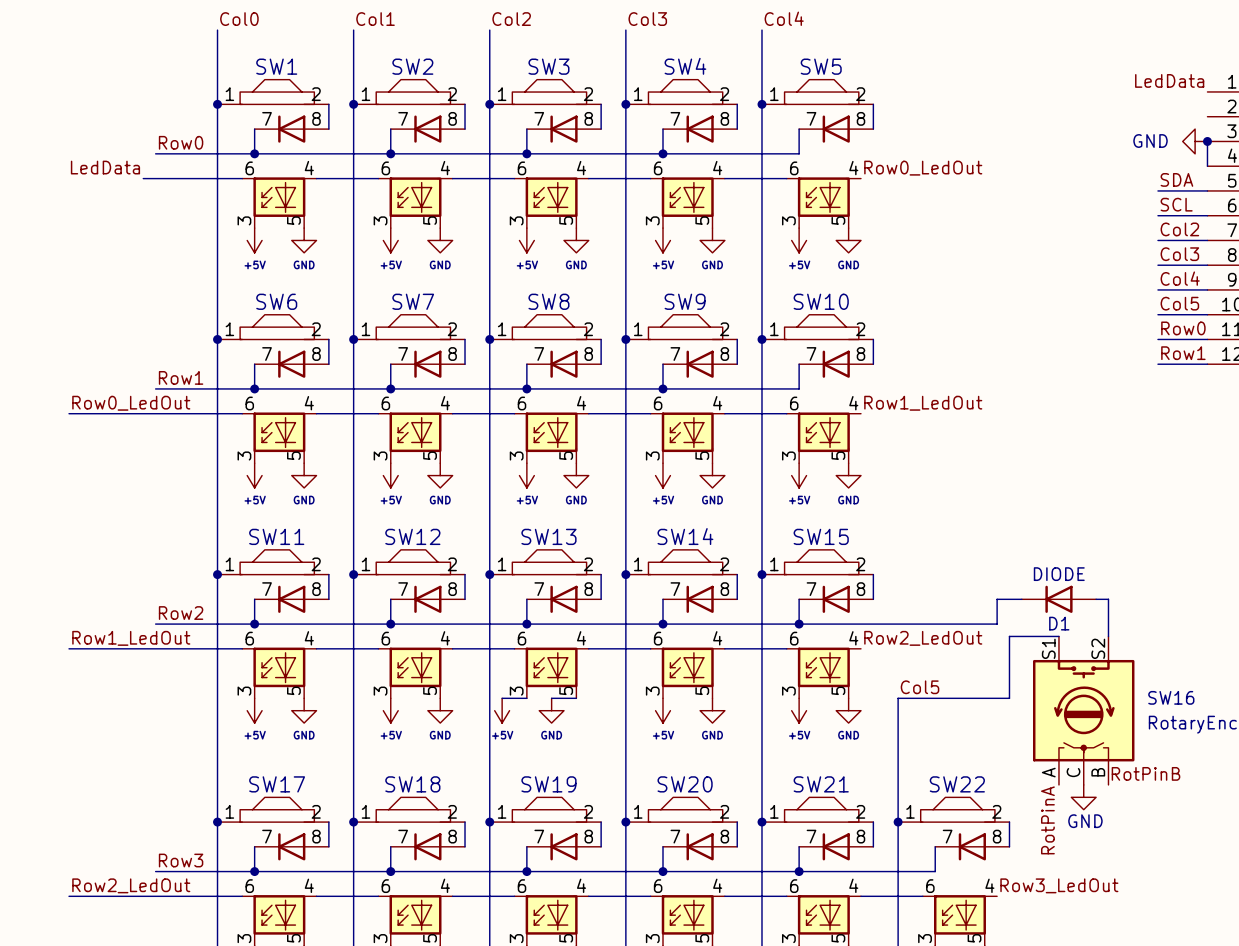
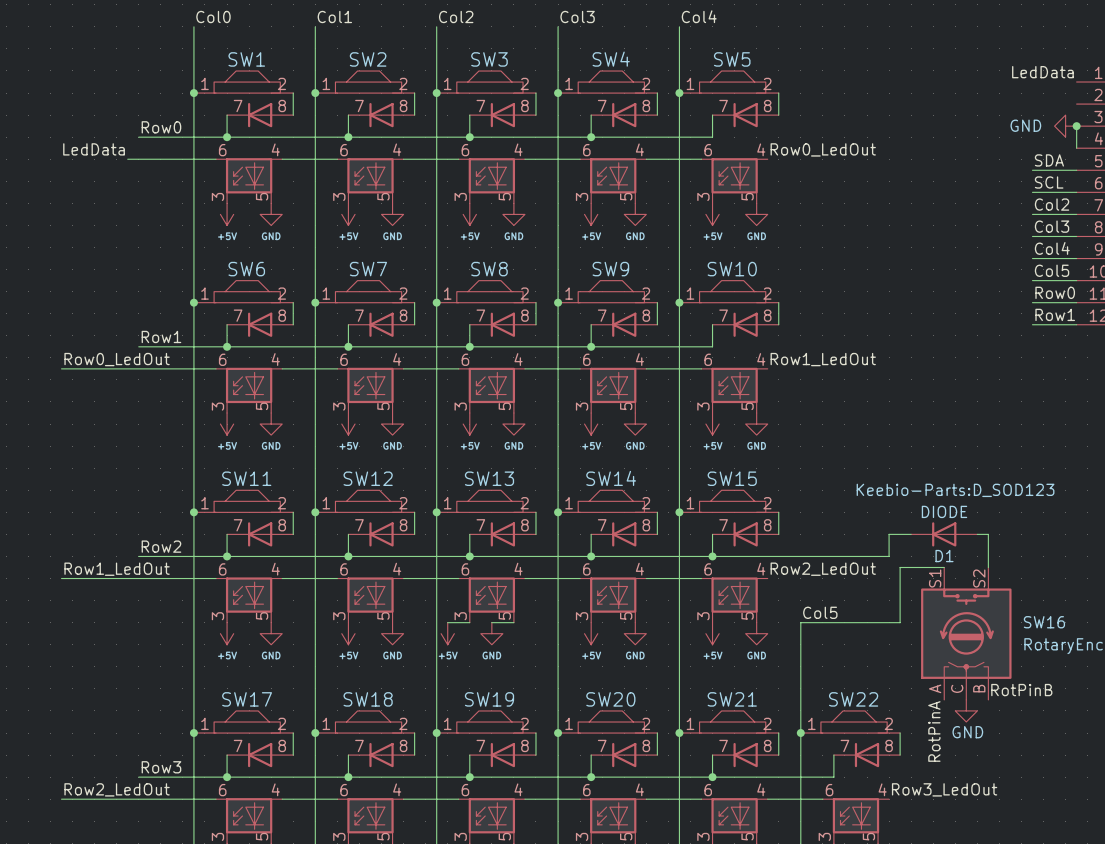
D1 text: none -> Keebio-Parts:D_SOD123 (955, 490)

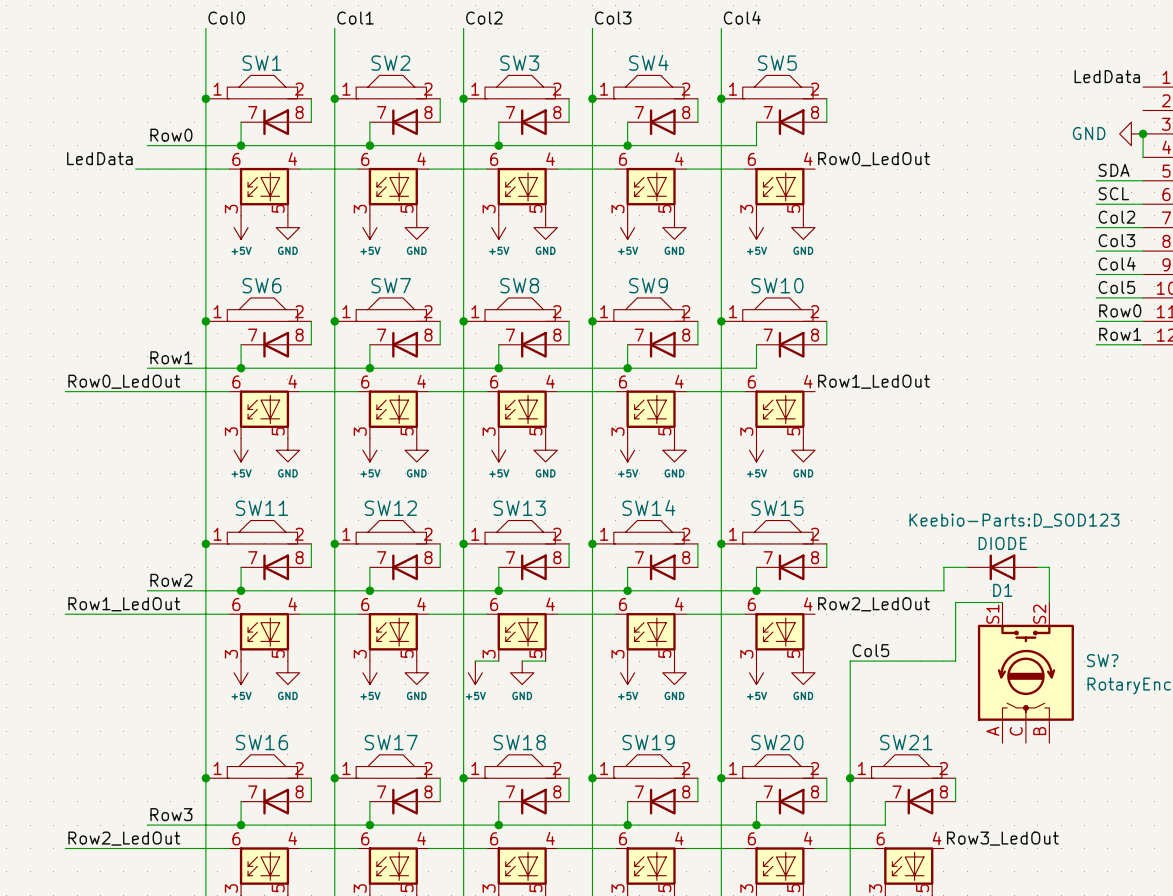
SW16 name: SW16 (1044, 622) -> SW? (1102, 660)
label: RotPinB (1021, 690) -> none
SW17 name: SW17 (247, 699) -> SW16 (261, 742)
SW18 name: SW18 (368, 699) -> SW17 (391, 742)
SW19 name: SW19 (489, 699) -> SW18 (519, 742)
SW20 name: SW20 (610, 699) -> SW19 (648, 742)
SW21 name: SW21 (732, 699) -> SW20 (777, 742)
SW22 name: SW22 (853, 699) -> SW21 (906, 742)
power symbol: GND (966, 710) -> none
label: RotPinA (934, 731) -> none

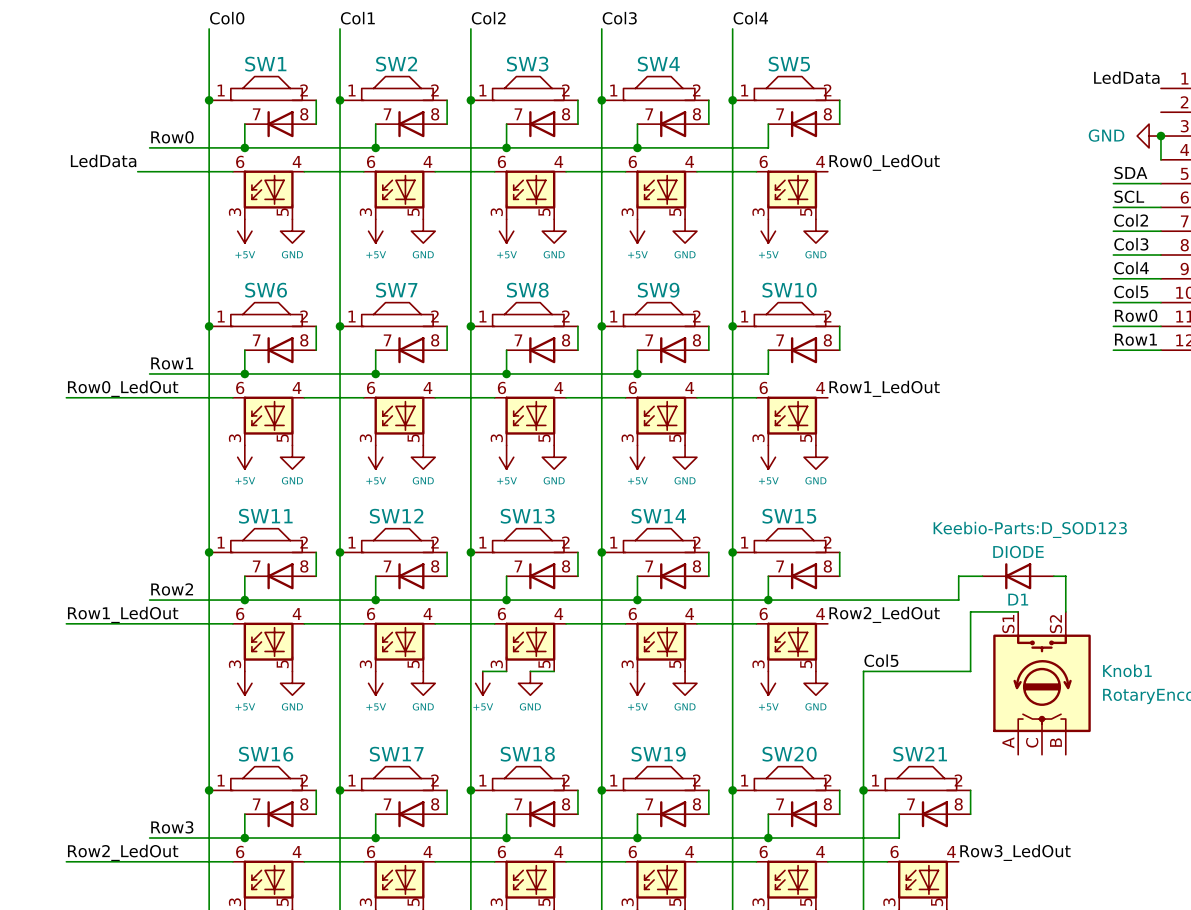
SW? name: SW? (1102, 660) -> Knob1 (1127, 670)

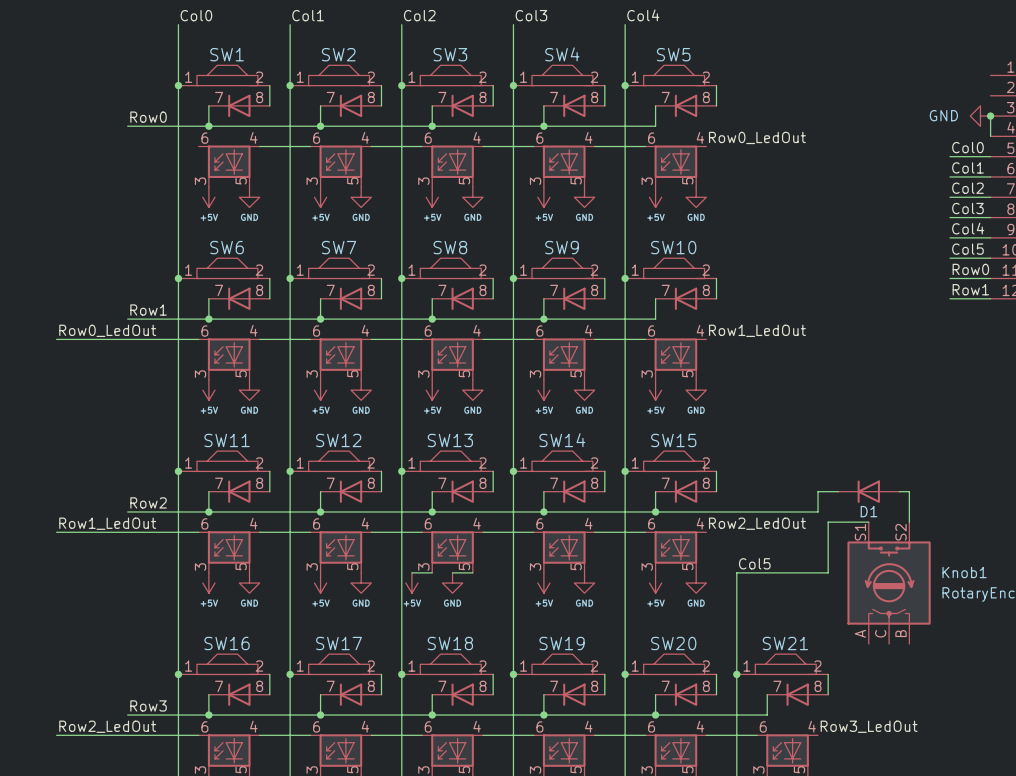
label: LedData (1126, 77) -> none
label: LedData (103, 160) -> none
wire: (137, 171) (232, 171) -> none
label: SDA (1130, 173) -> Col0 (967, 147)
label: SCL (1129, 196) -> Col1 (967, 167)
D1 text: Keebio-Parts:D_SOD123 (1030, 529) -> none
D1 value: DIODE (1018, 552) -> none

